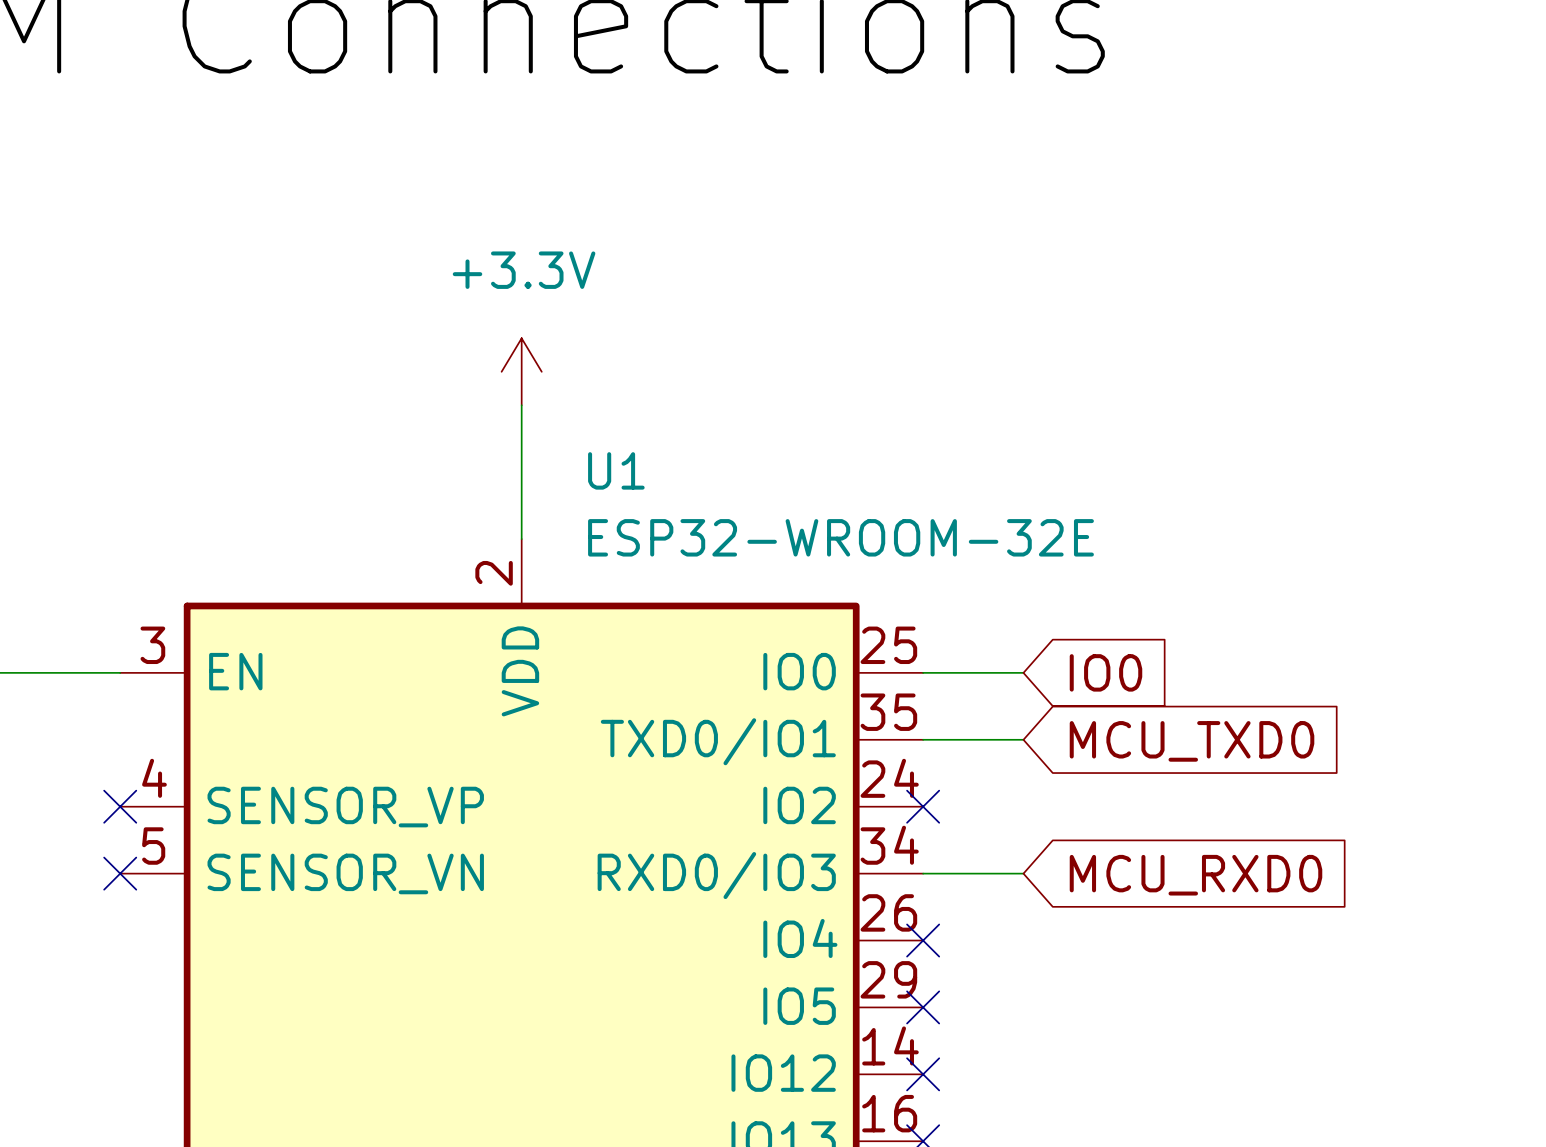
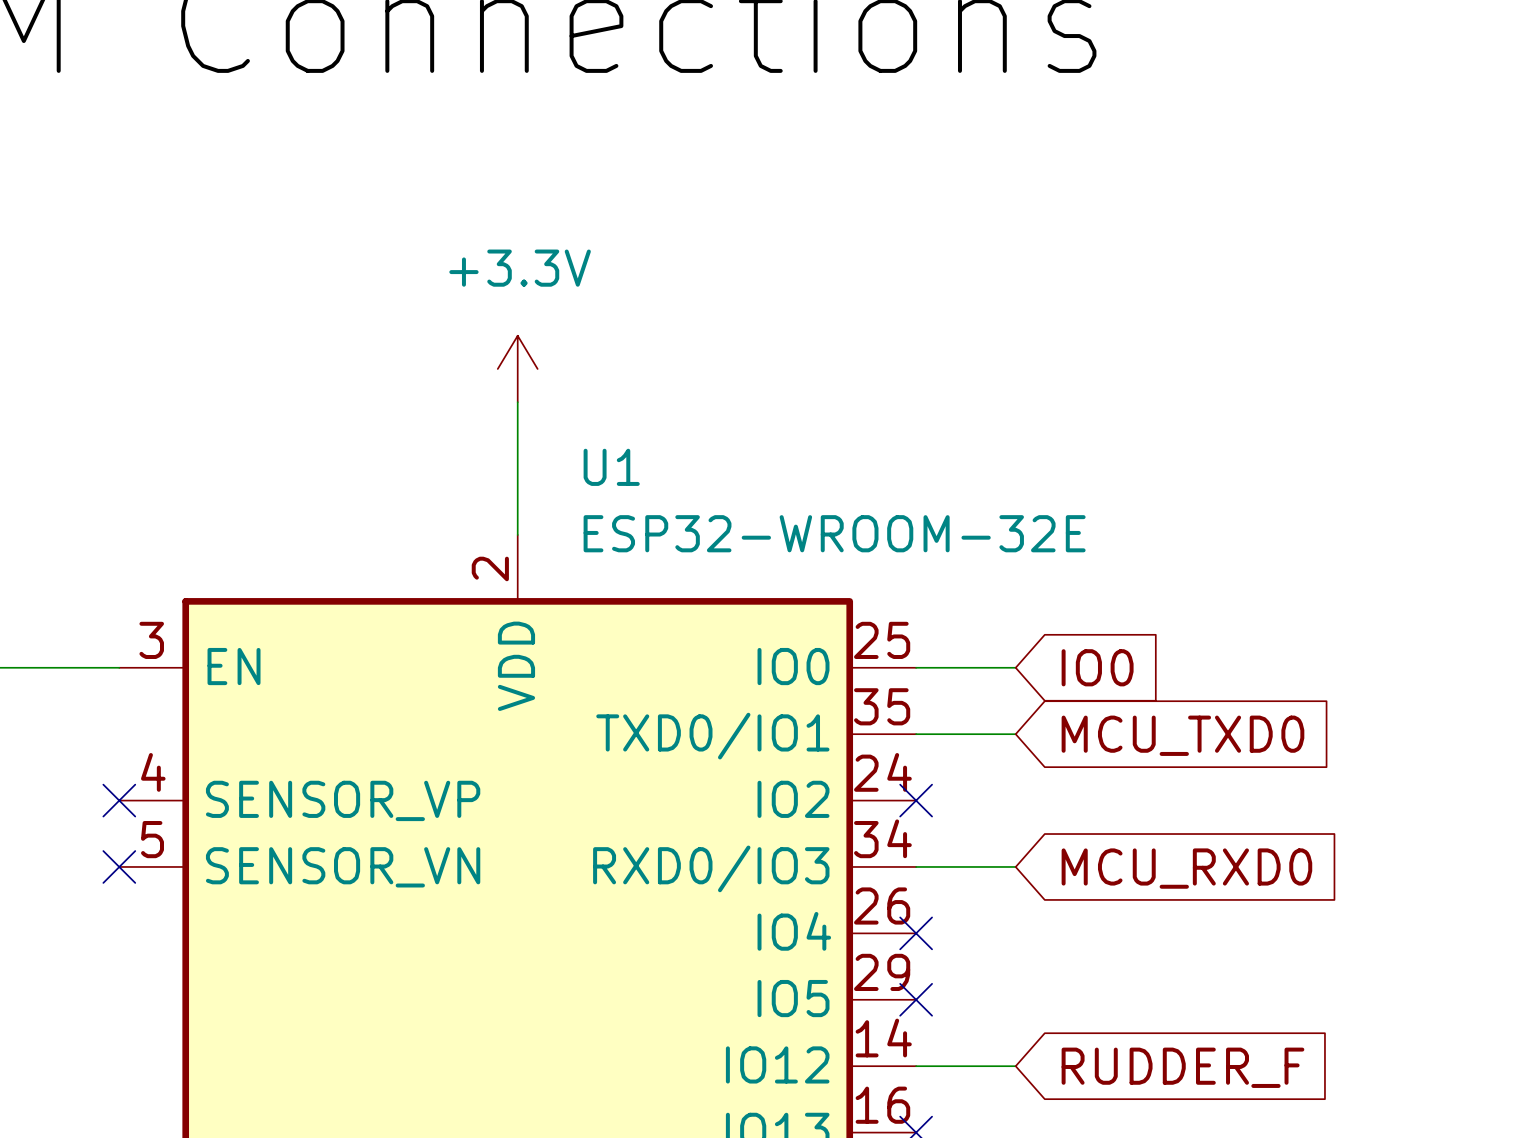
wire: none -> (916, 1066) (1015, 1066)
no-connect mark: (923, 1074) -> none
global label: none -> RUDDER_F (1182, 1067)

